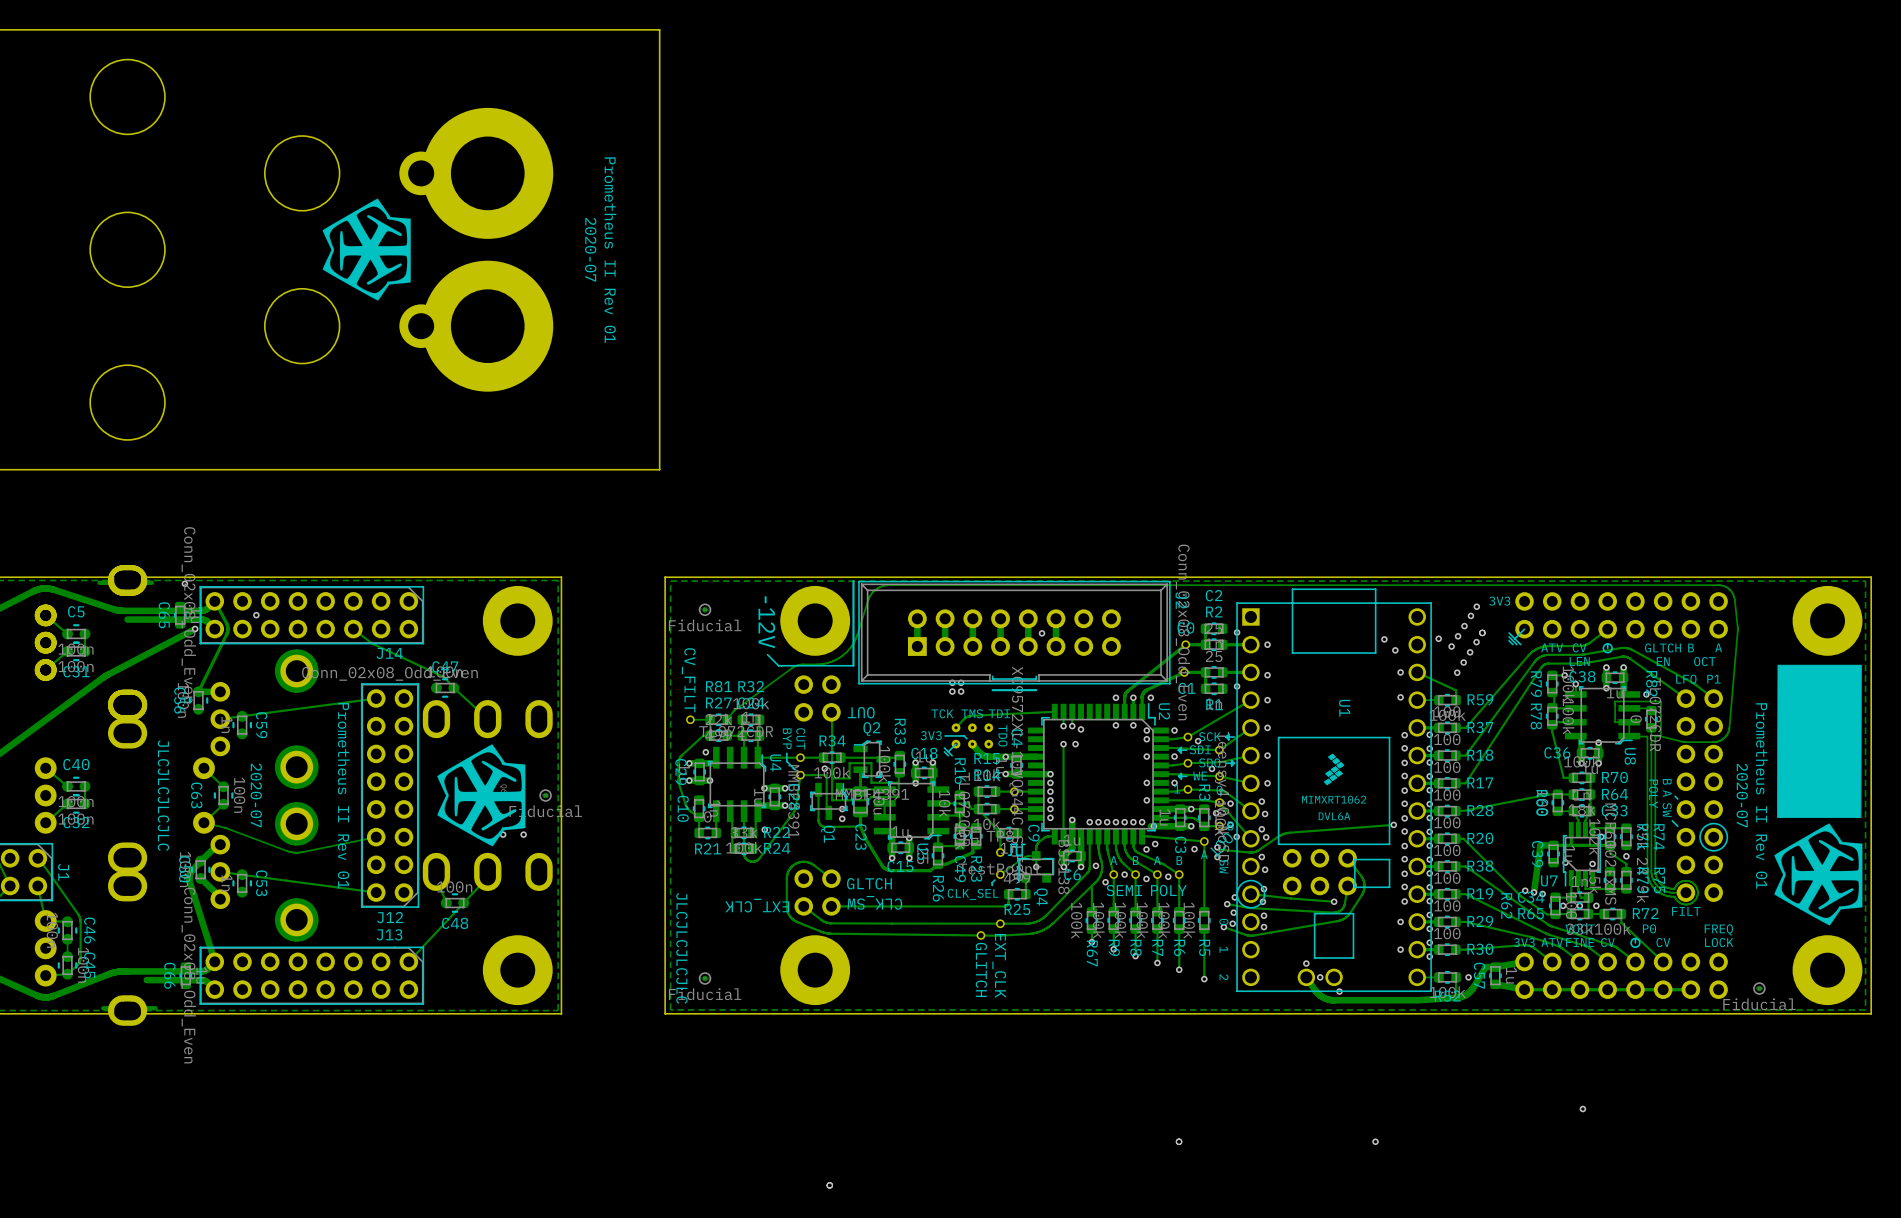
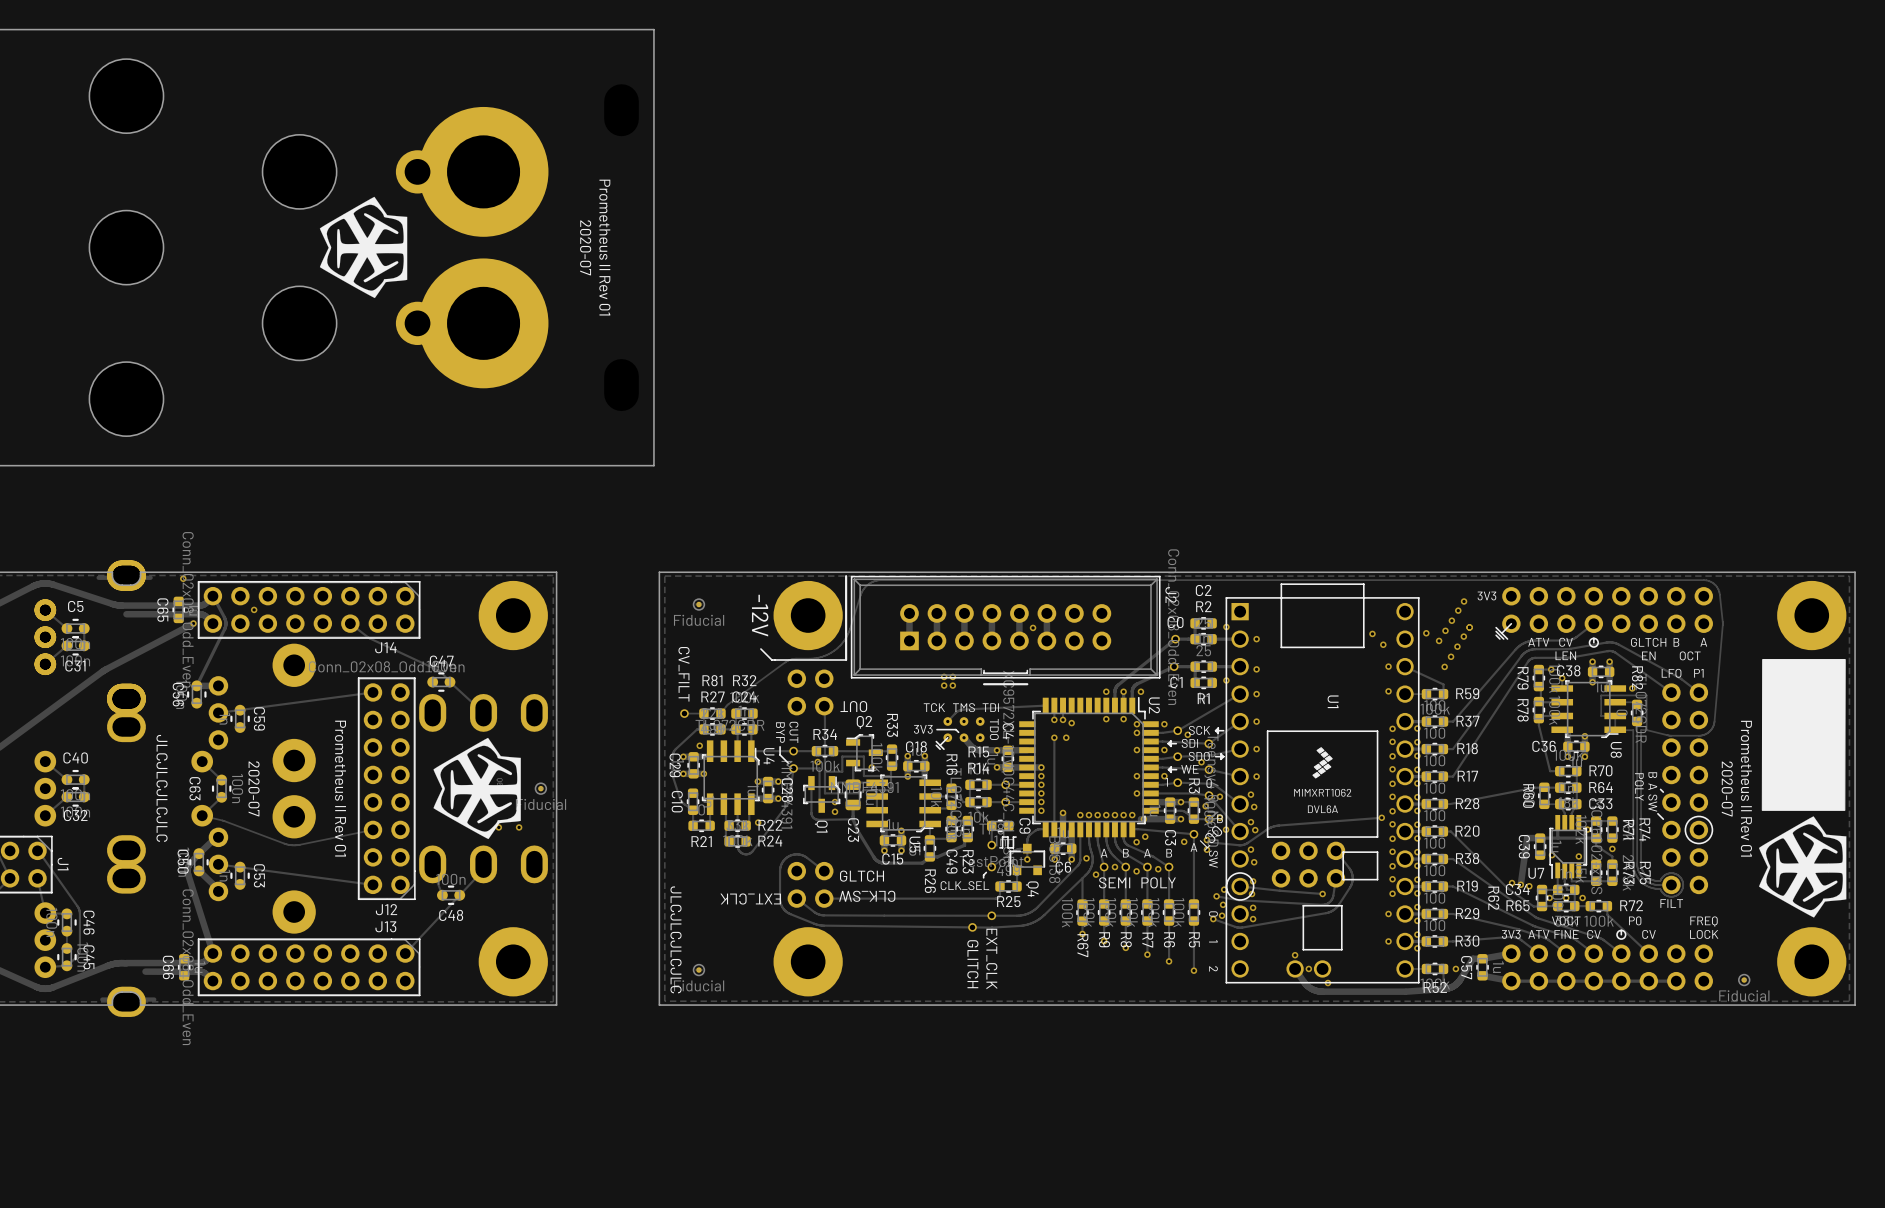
via: (1582, 1109) -> none
via: (1179, 1141) -> none
via: (1375, 1141) -> none
via: (829, 1185) -> none

